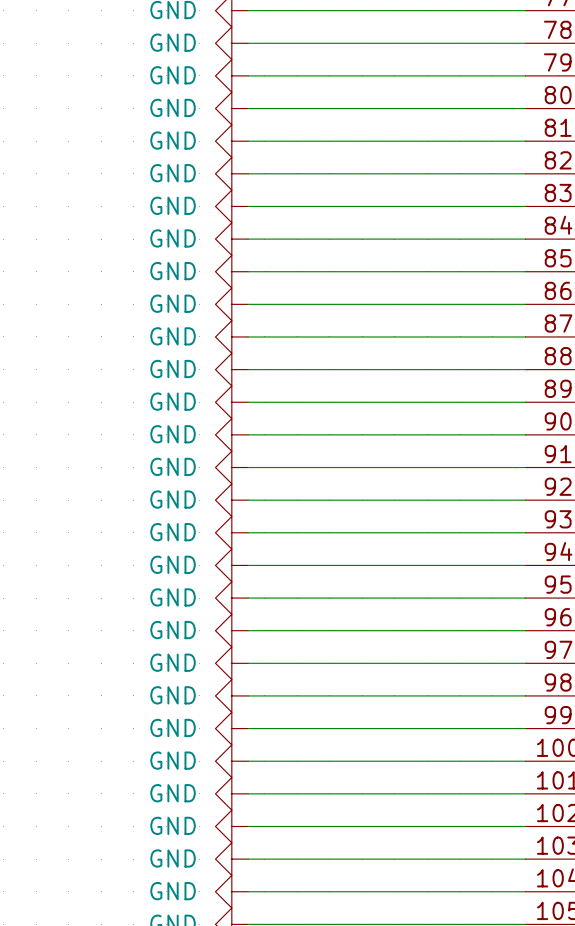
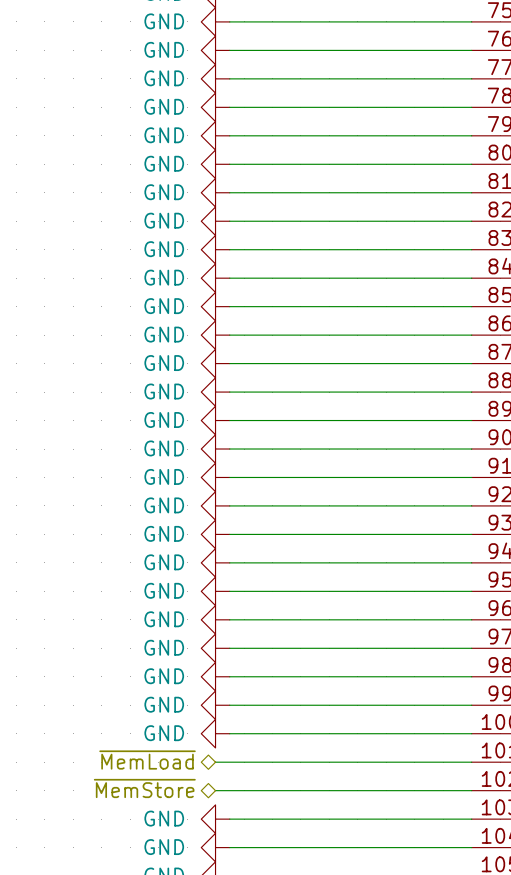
hierarchical label: none -> ~{MemLoad} (147, 760)
power symbol: GND (231, 793) -> none
hierarchical label: none -> ~{MemStore} (144, 788)
power symbol: GND (231, 826) -> none

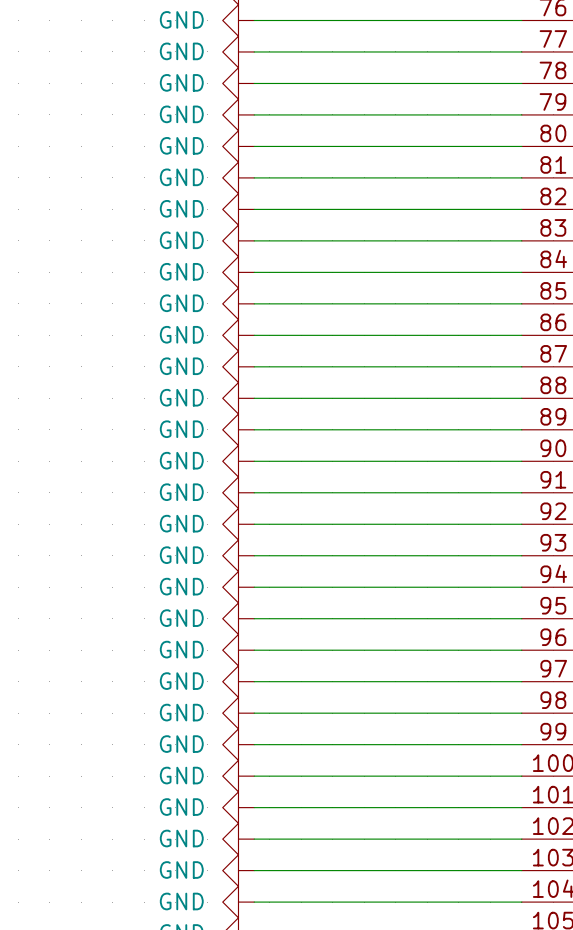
hierarchical label: ~{MemLoad} (147, 760) -> none
power symbol: none -> GND (238, 807)
hierarchical label: ~{MemStore} (144, 788) -> none
power symbol: none -> GND (238, 839)

